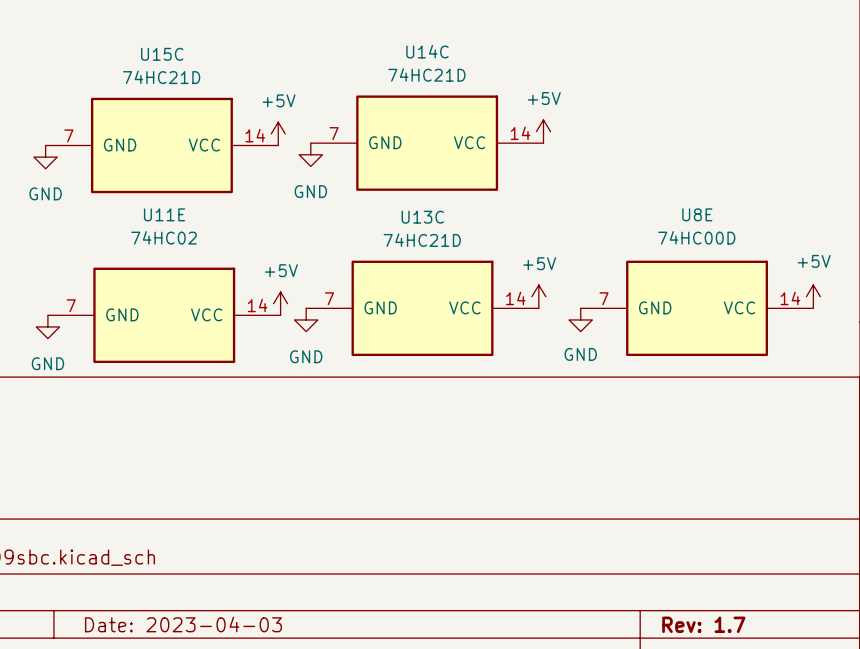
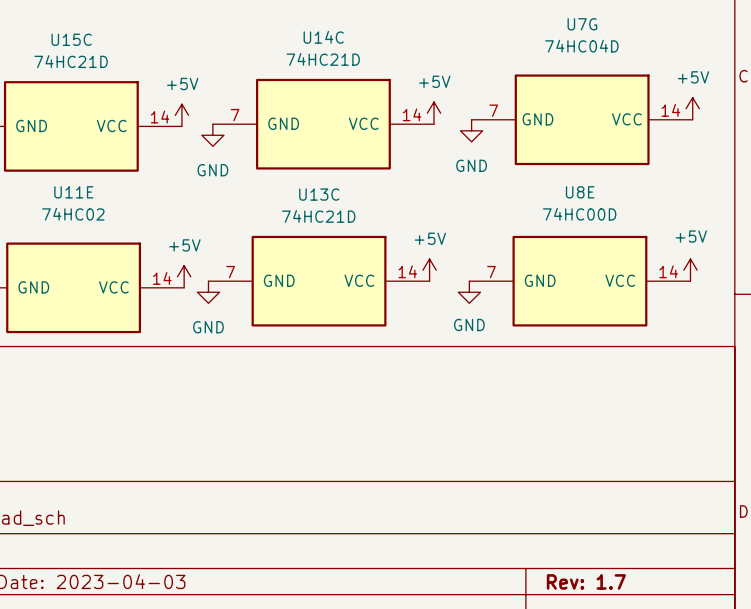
power symbol: none -> +5V (692, 108)
U7G: none -> 74HC04D (582, 119)
power symbol: none -> GND (471, 130)

